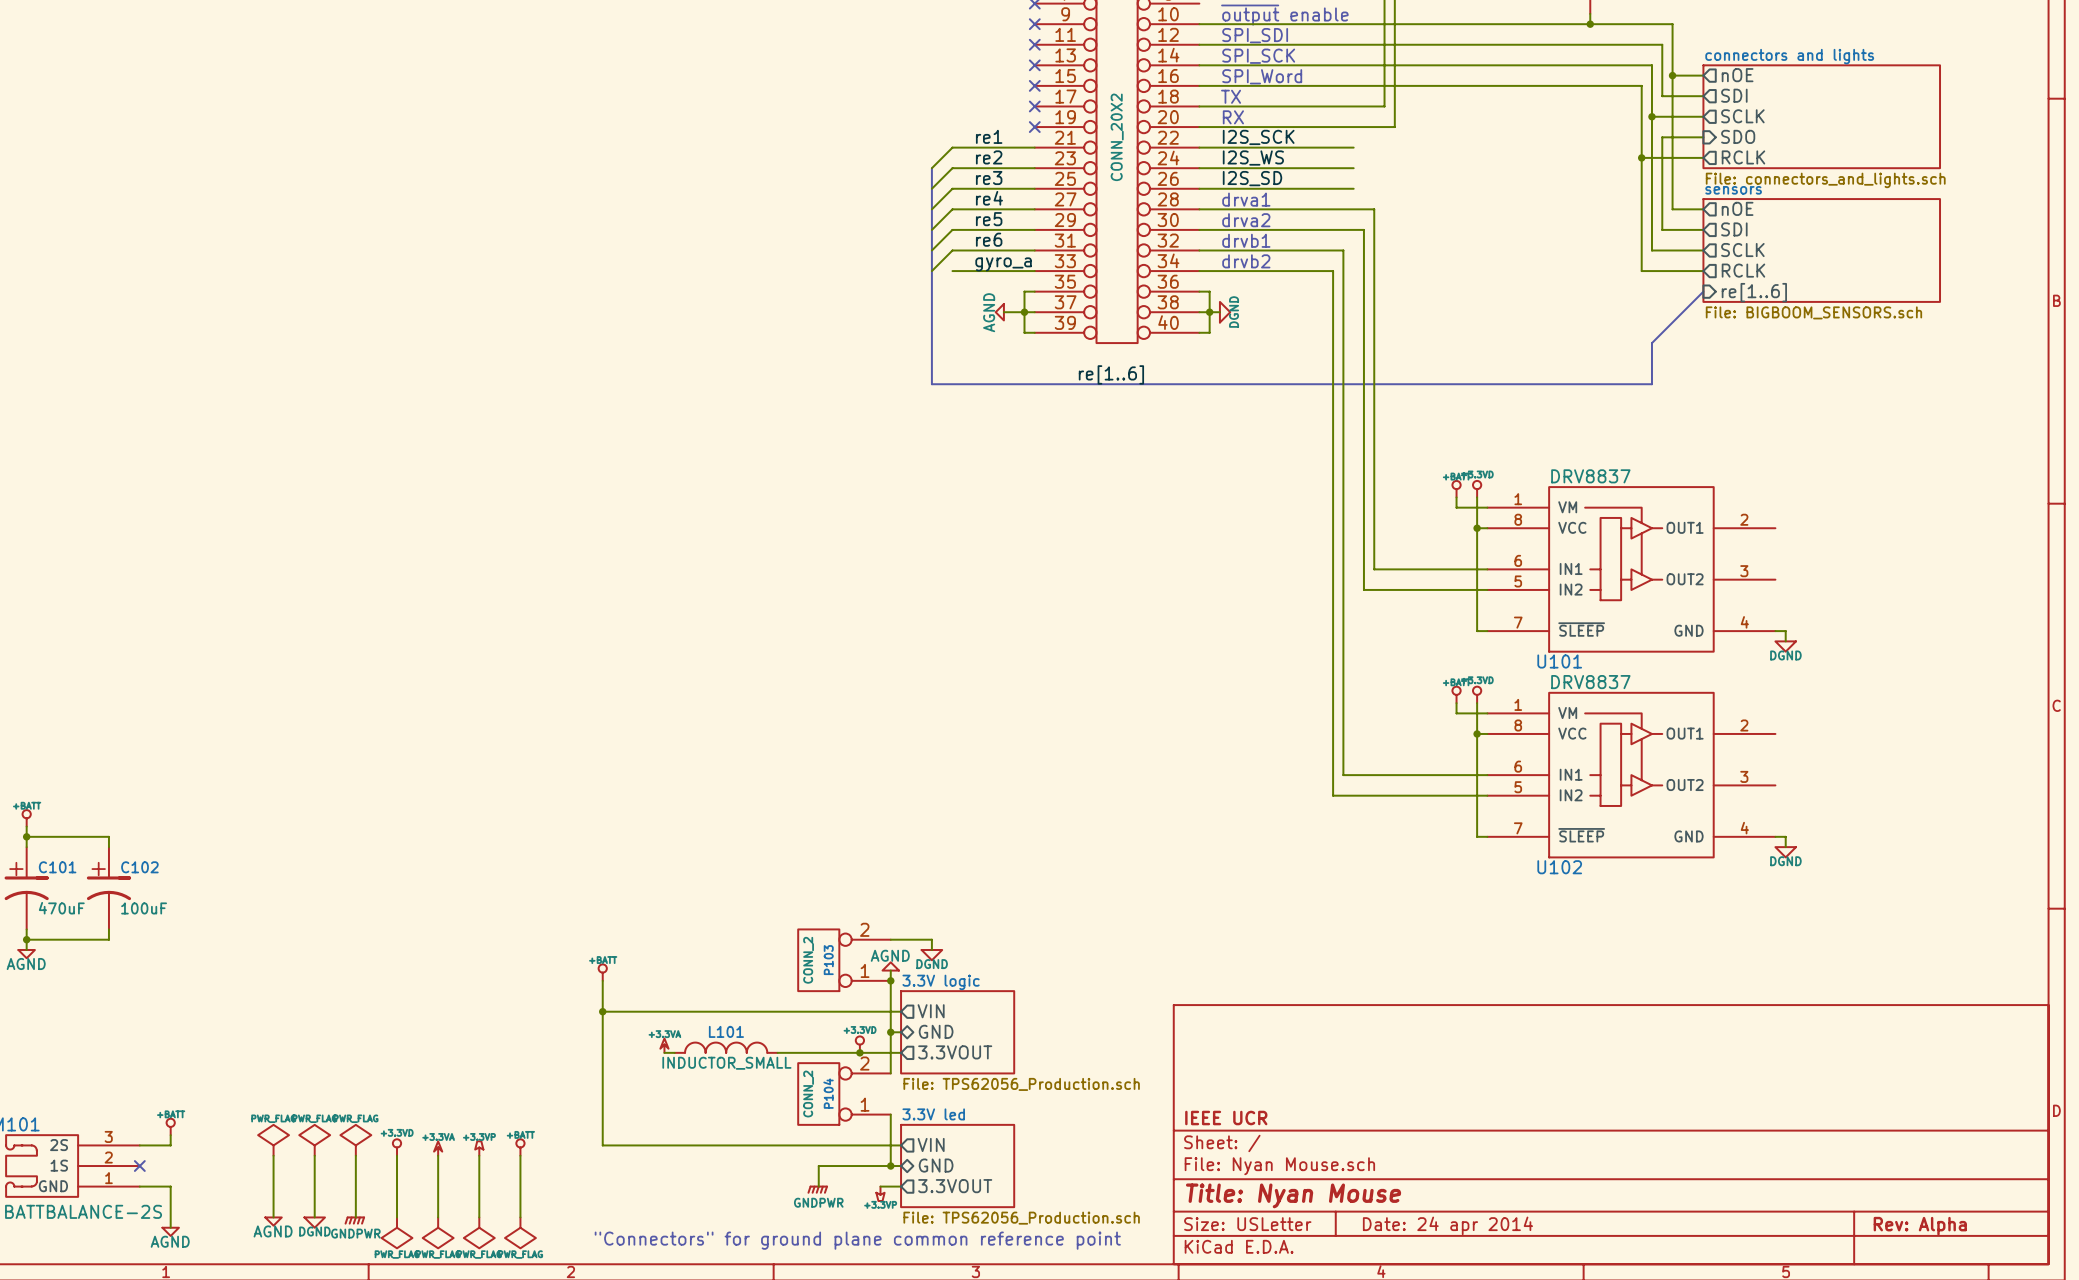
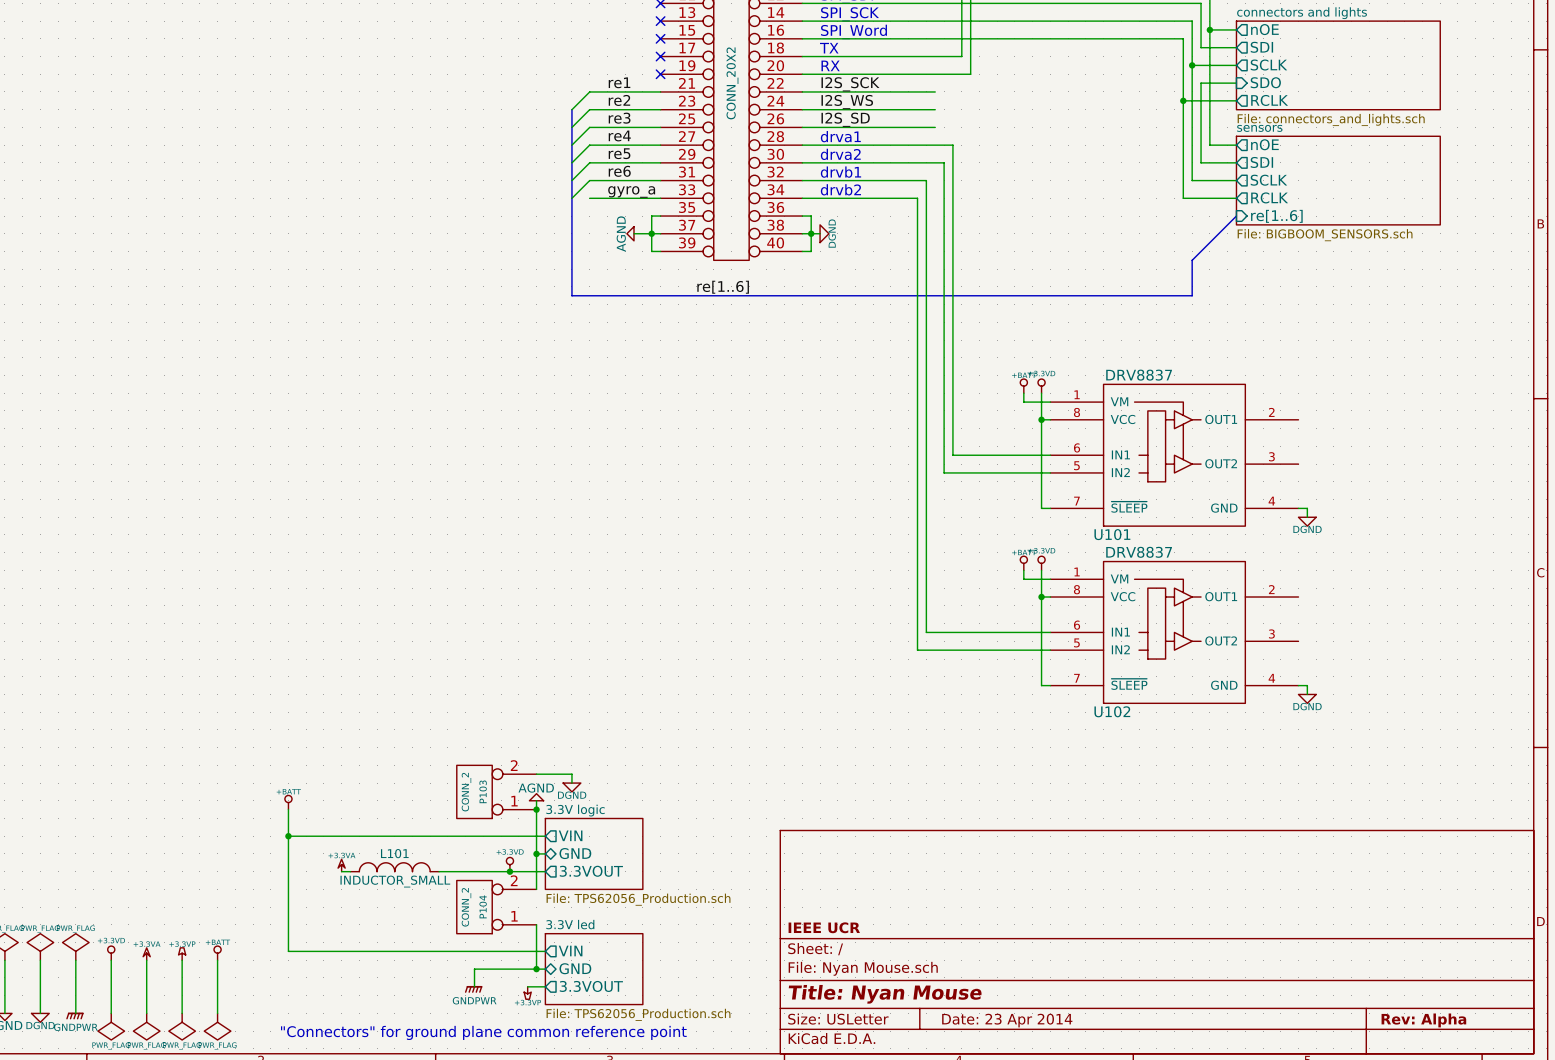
title block: Date: 24 apr 2014 (1447, 1225) -> Date: 23 Apr 2014 (1007, 1020)

